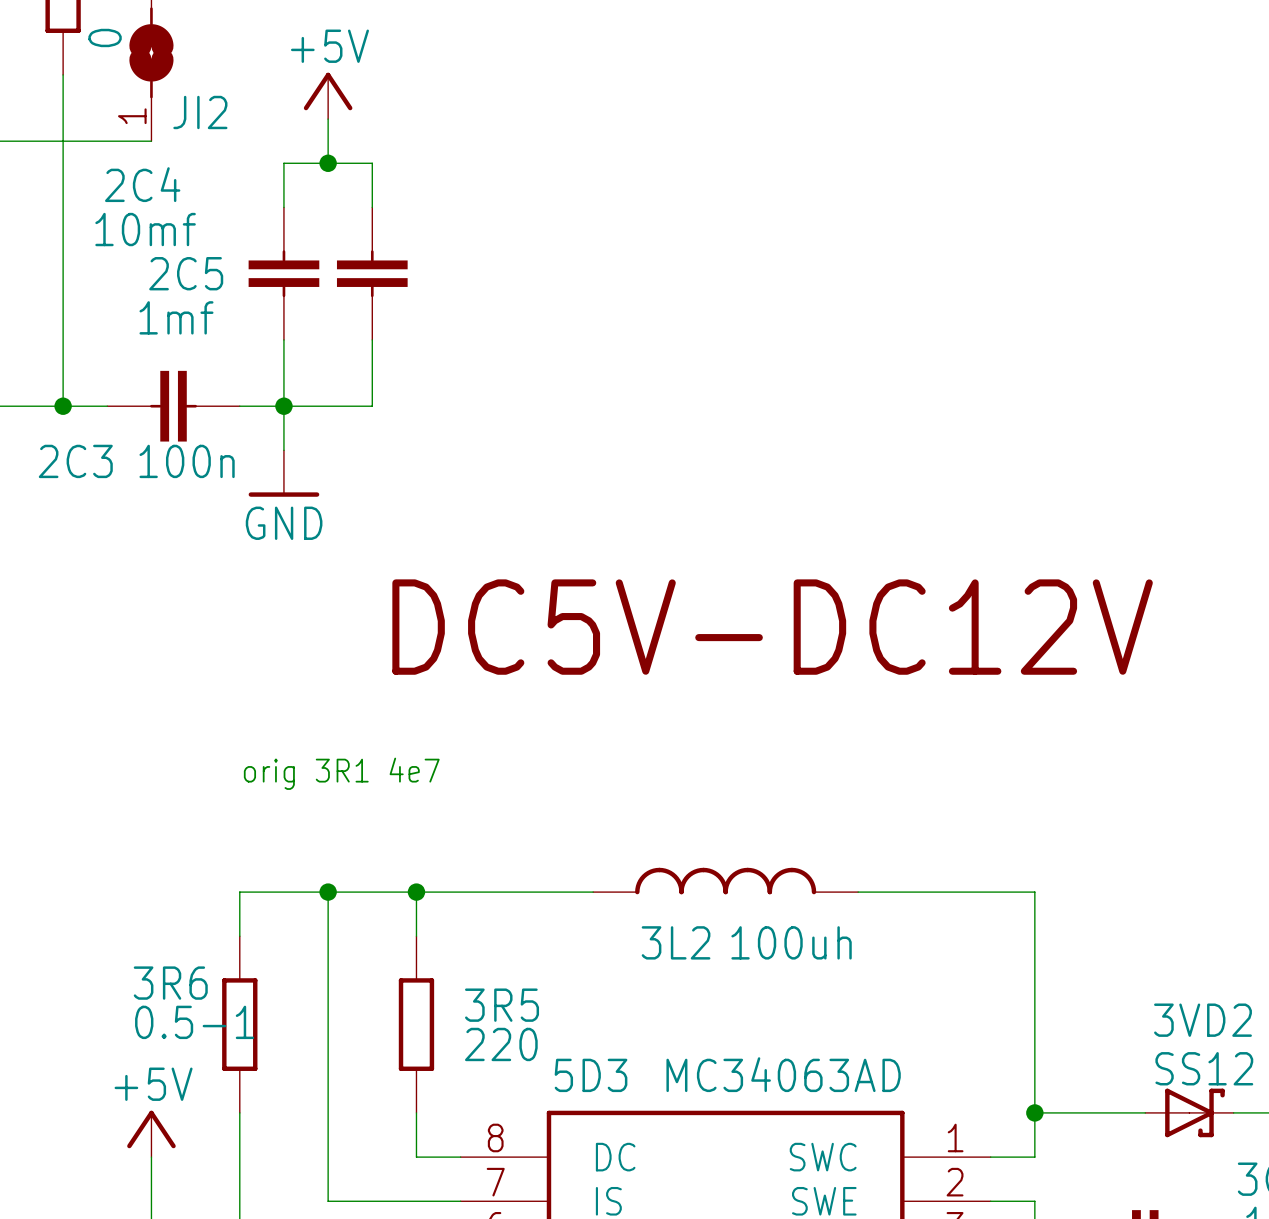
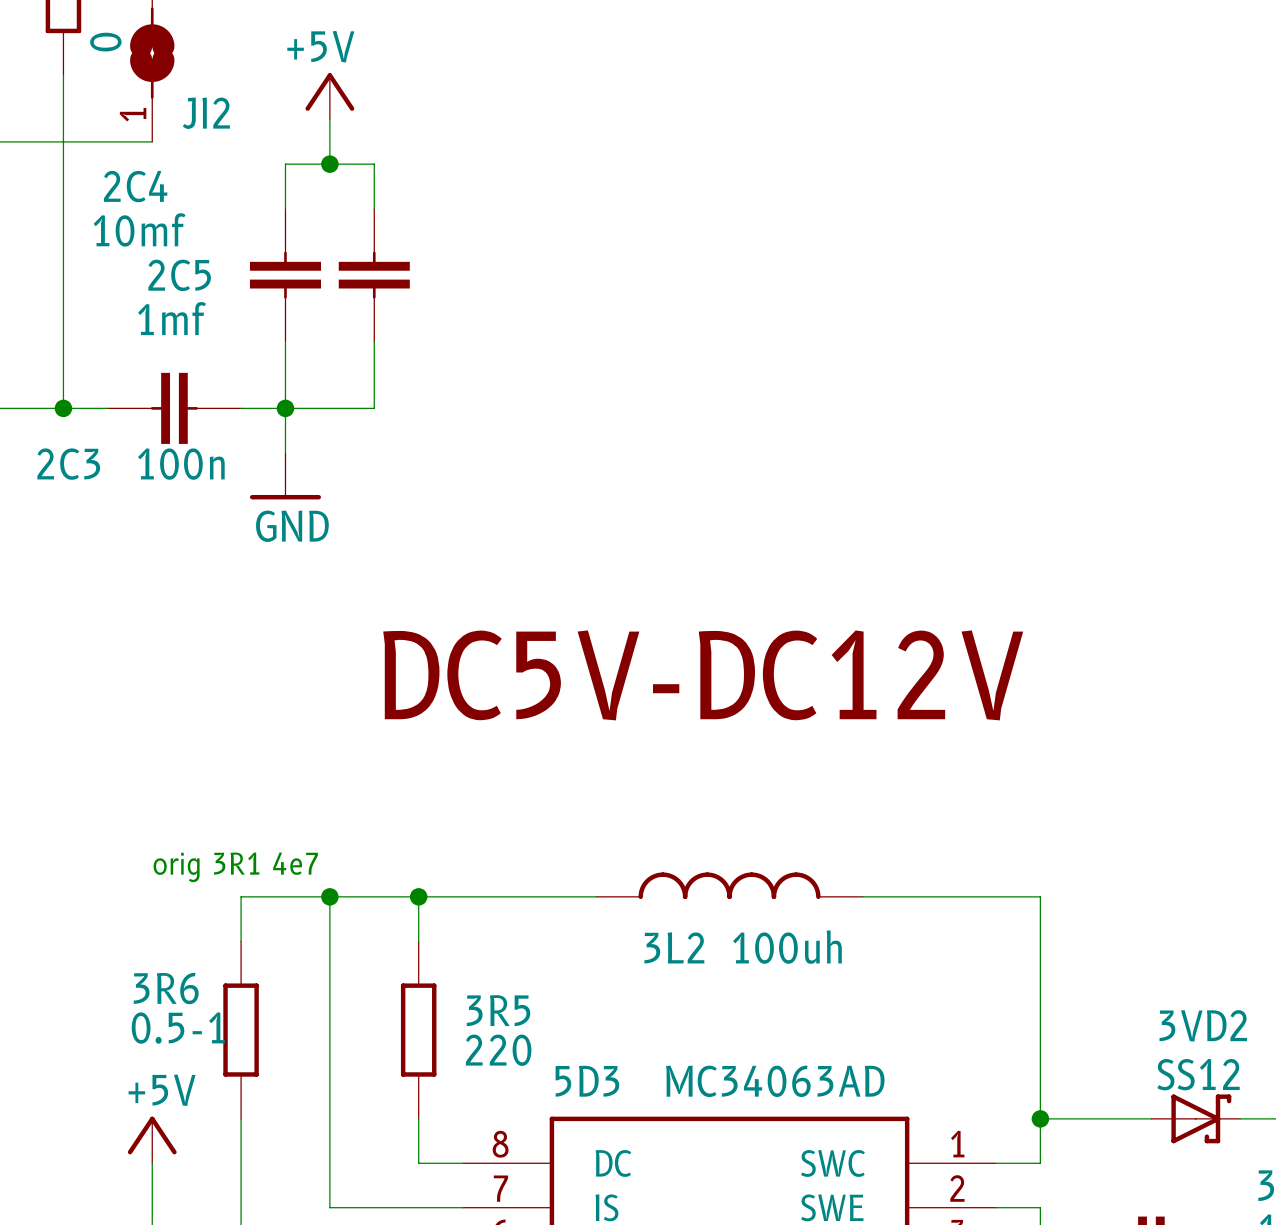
text position: DC5V-DC12V (772, 627) -> DC5V-DC12V (703, 675)
text position: orig 3R1 4e7 (341, 773) -> orig 3R1 4e7 (235, 867)

